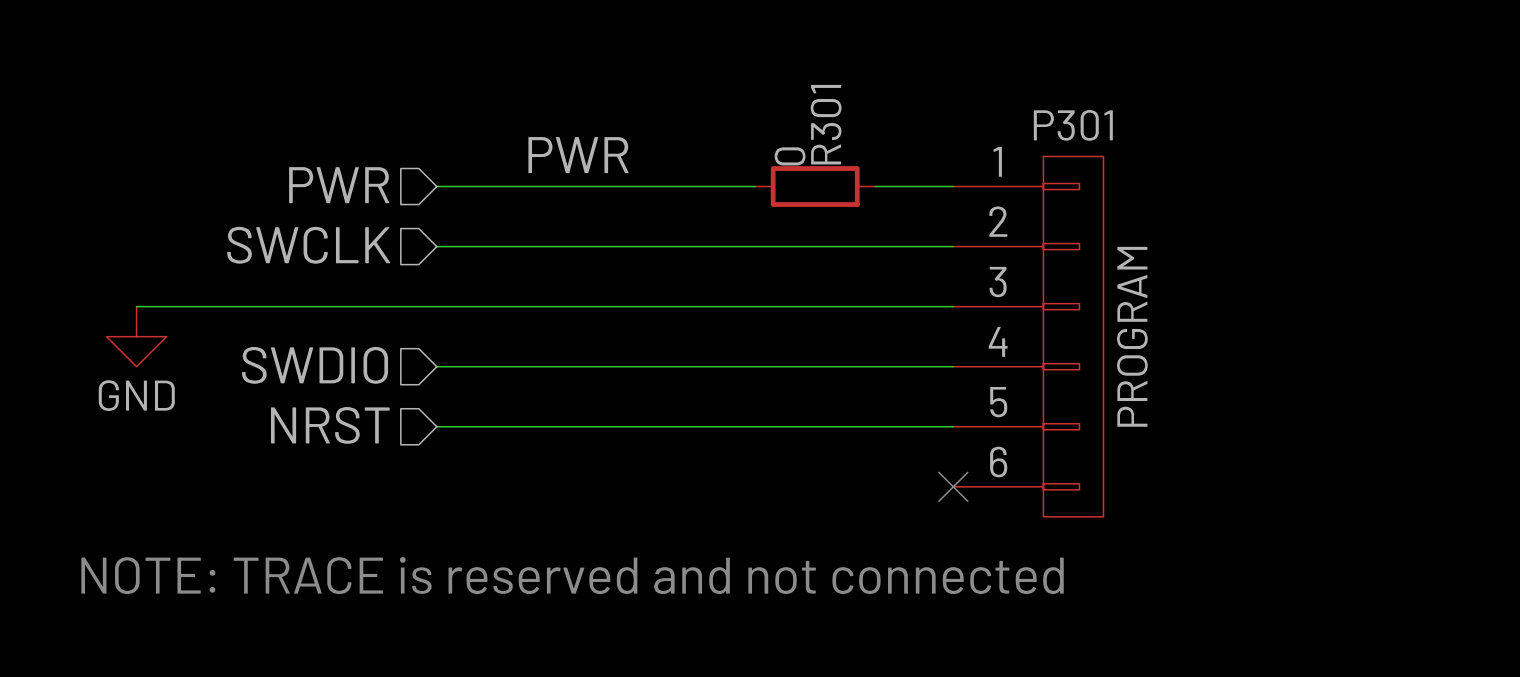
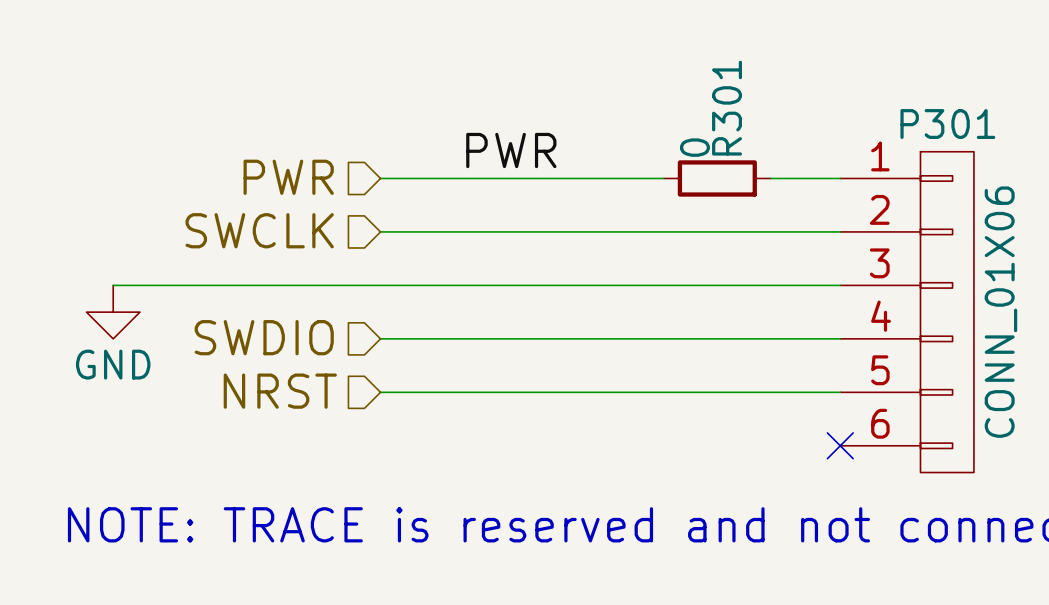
P301 value: PROGRAM (1132, 336) -> CONN_01X06 (1000, 312)

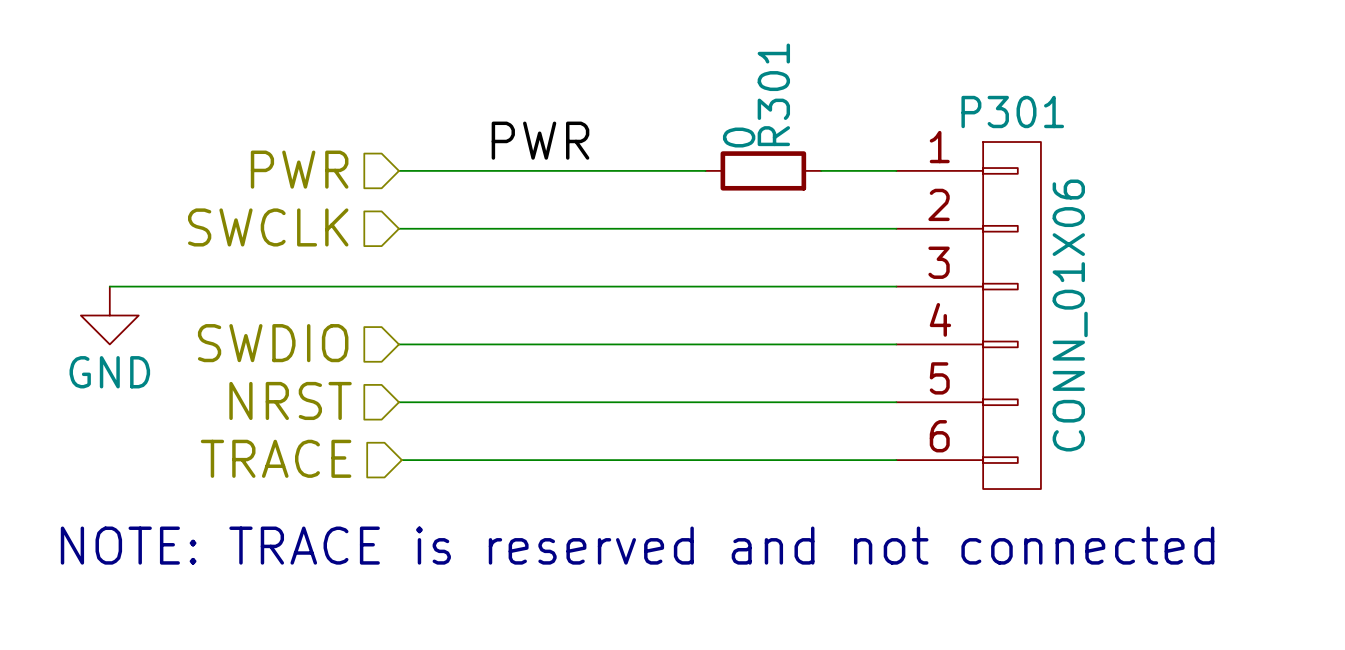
hierarchical label: none -> TRACE (276, 458)
wire: none -> (401, 460) (896, 460)
no-connect mark: (840, 445) -> none

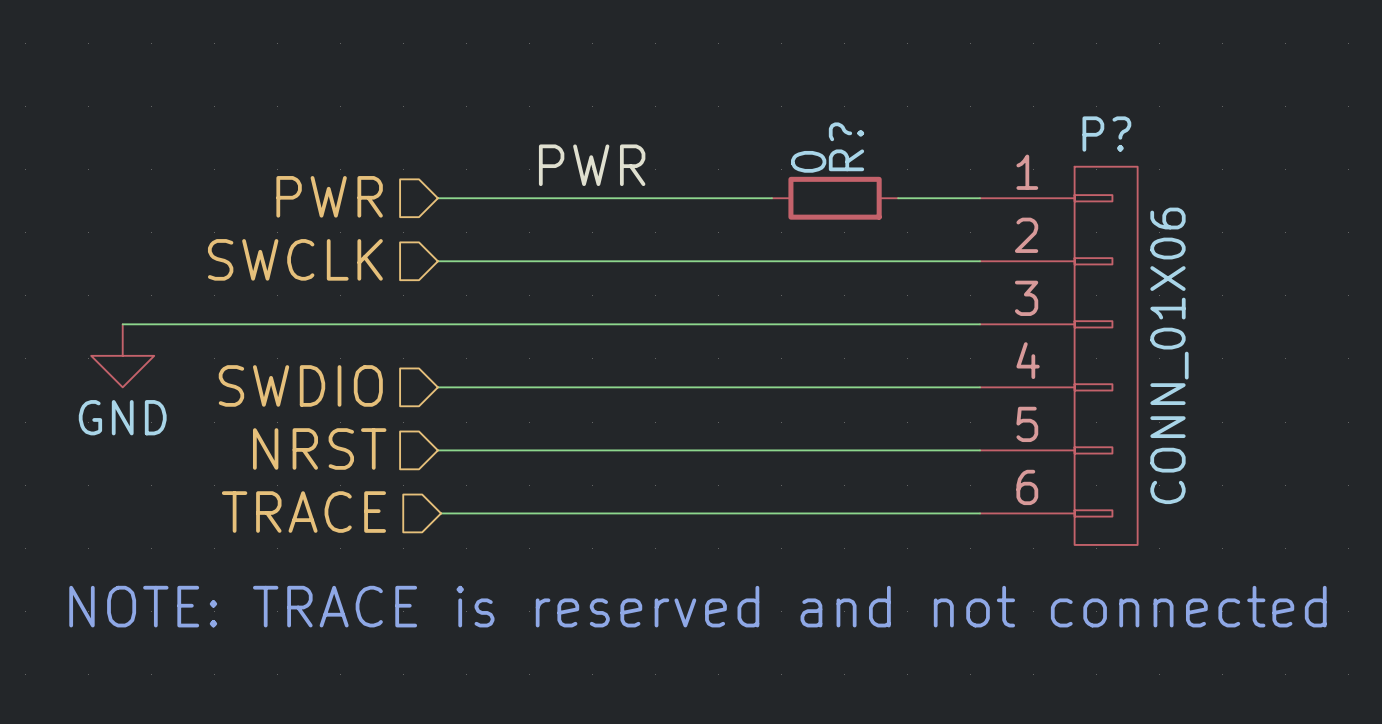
R301 name: R301 (773, 94) -> R? (846, 146)
P301 name: P301 (1012, 112) -> P? (1106, 134)

